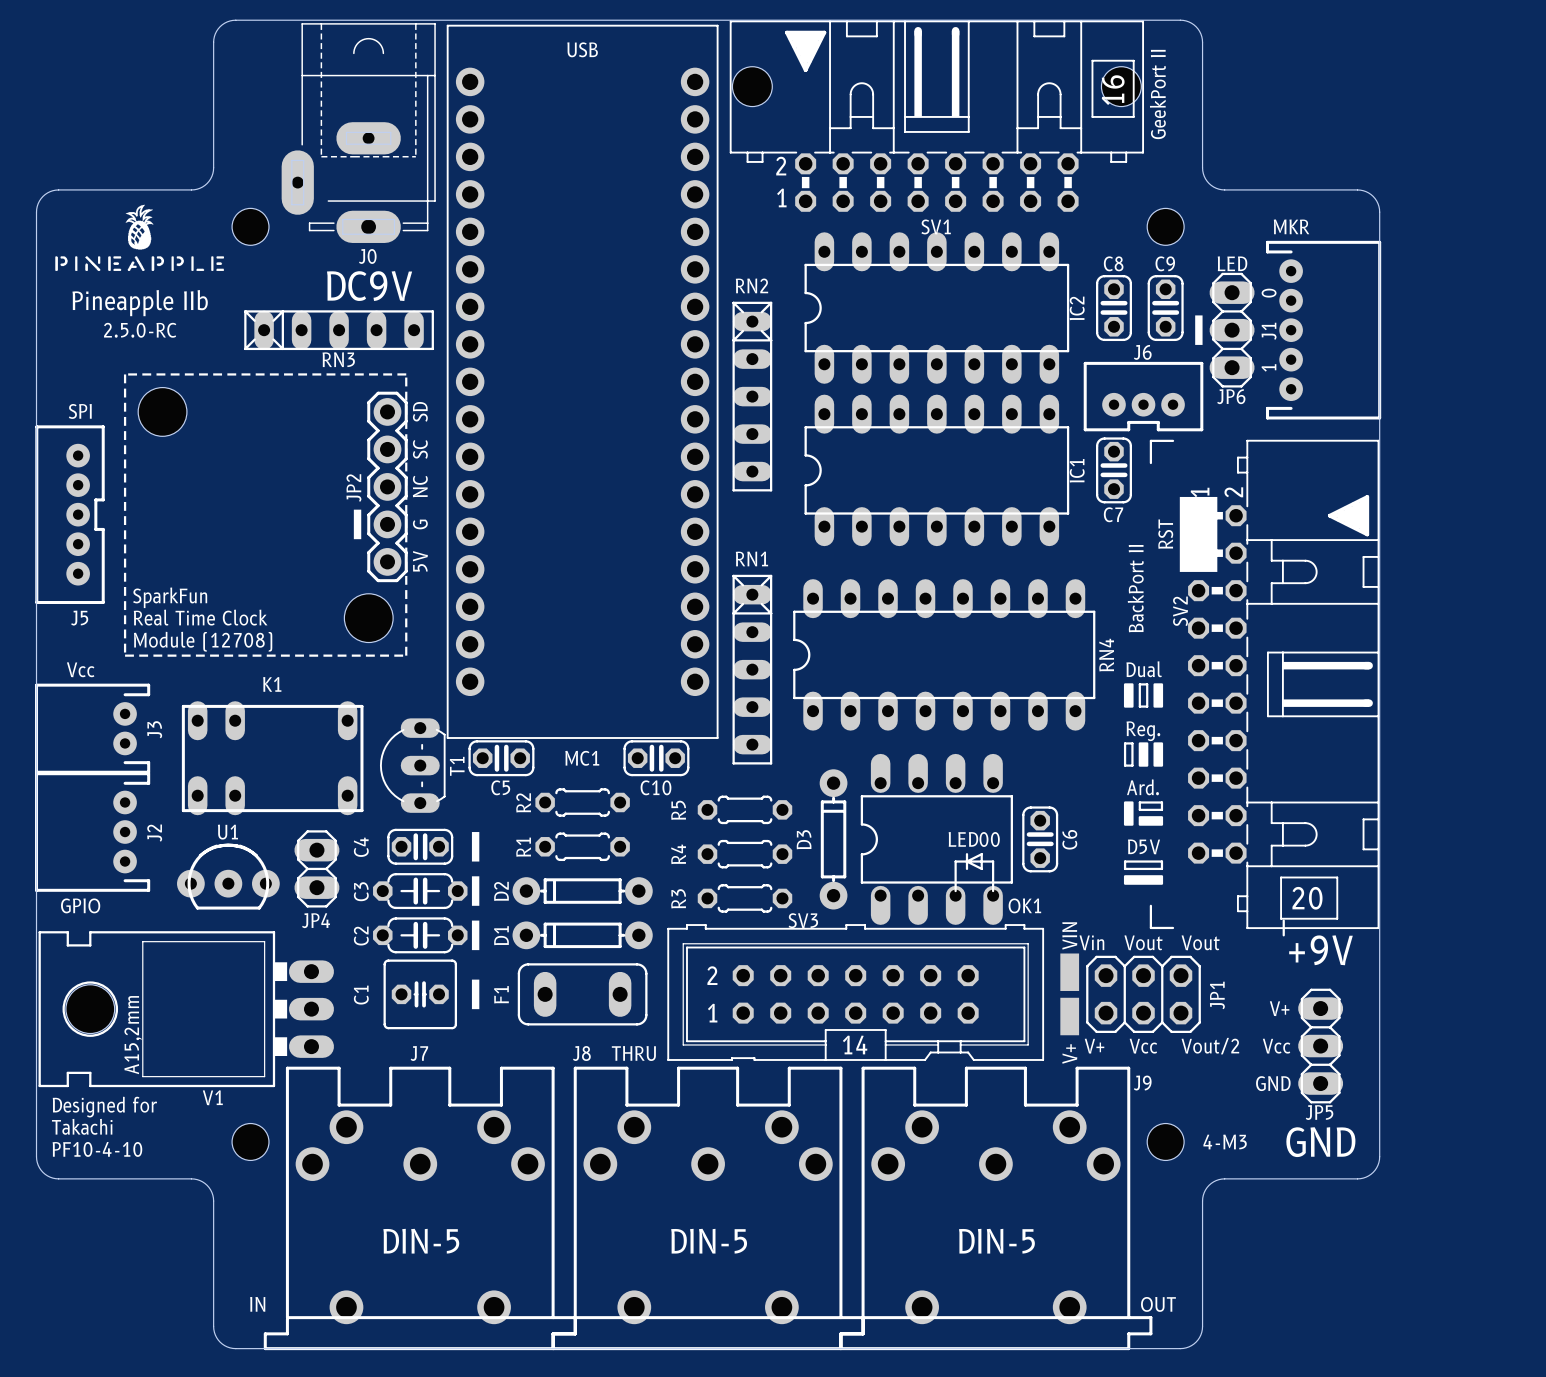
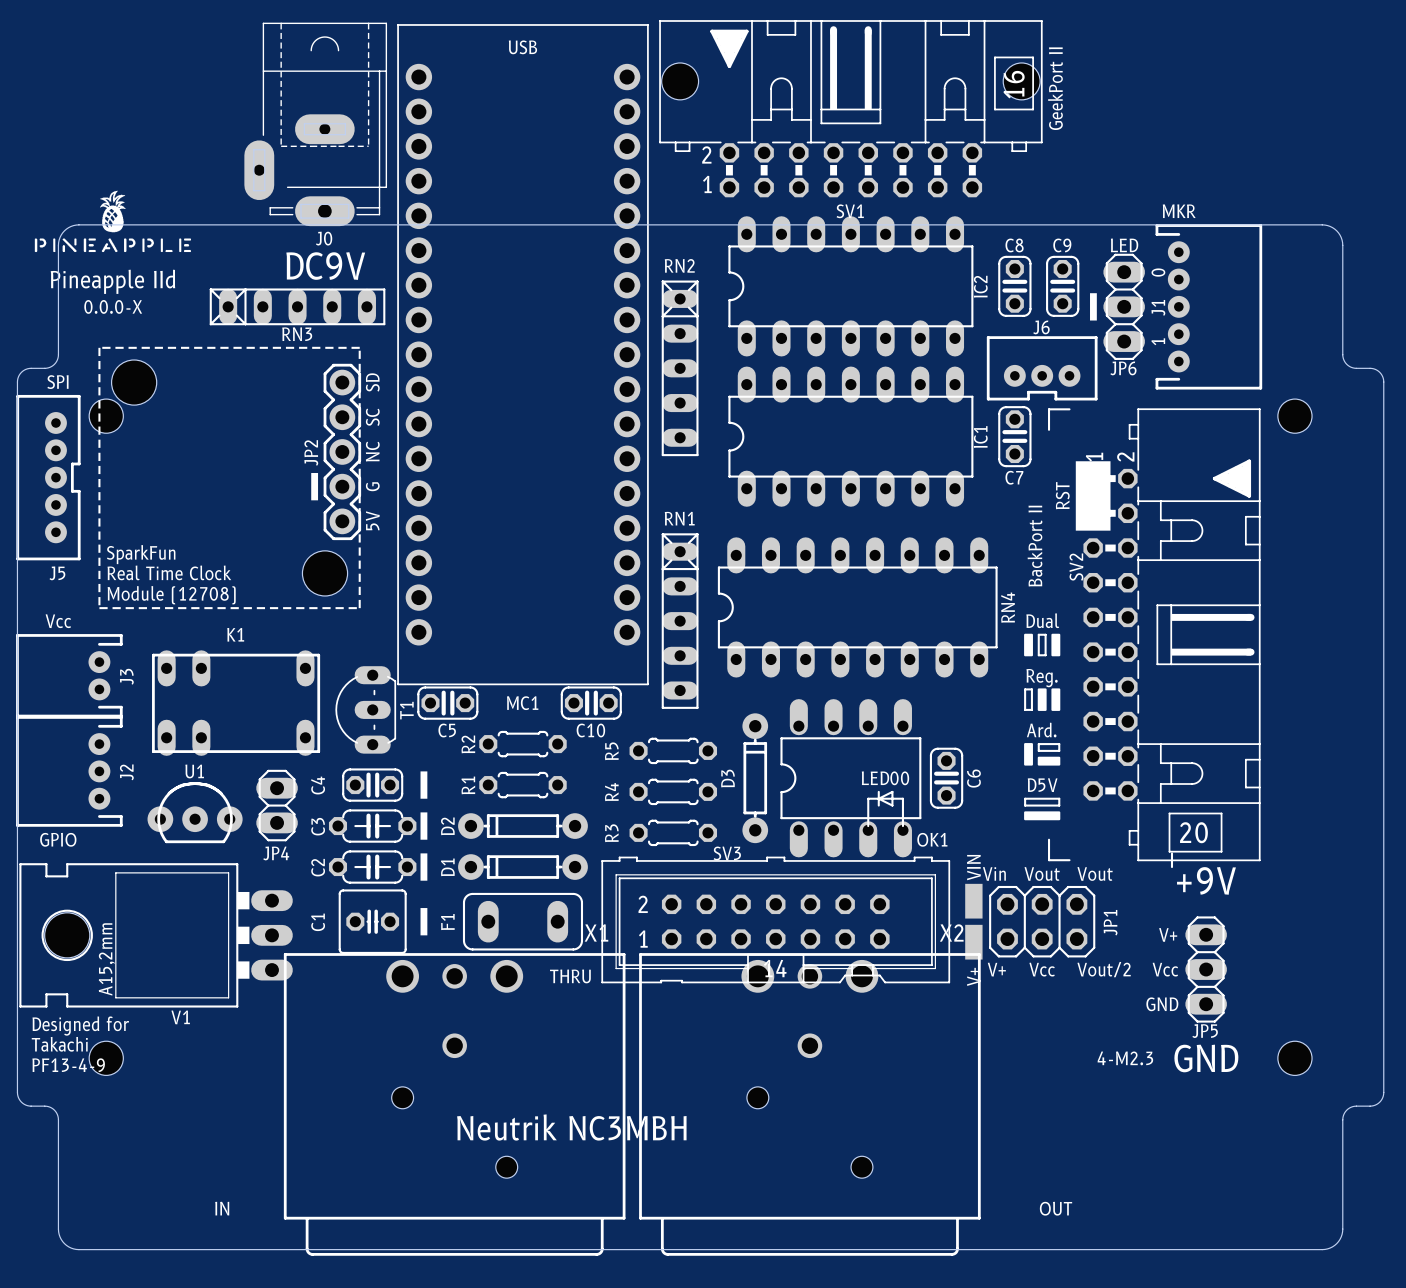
hole position: (250, 226) -> (106, 416)
hole position: (1165, 226) -> (1294, 416)
text: Pineapple IIb (140, 303) -> Pineapple IId (112, 281)
text: 2.5.0-RC (140, 330) -> 0.0.0-X (113, 306)
board edge: (36, 411) (36, 212) (39, 201) (47, 192) (55, 190) (191, 189) (199, 188) (207, 183) (211, 176) (213, 167) (213, 39) (220, 26) (230, 20) (1180, 20) (1193, 24) (1199, 31) (1202, 39) (1202, 167) (1204, 176) (1209, 183) (1216, 188) (1224, 189) (1360, 190) (1373, 196) (1379, 209) (1379, 1156) (1377, 1165) (1373, 1172) (1360, 1178) (1224, 1178) (1216, 1180) (1209, 1185) (1204, 1192) (1202, 1201) (1202, 1329) (1196, 1342) (1188, 1346) (1180, 1348) -> (17, 382) (19, 375) (24, 370) (48, 367) (57, 359) (58, 242) (64, 230) (76, 225) (1322, 224) (1334, 229) (1340, 235) (1342, 242) (1343, 358) (1351, 367) (1376, 370) (1381, 375) (1383, 382) (1383, 1096) (1376, 1104) (1351, 1107) (1343, 1116) (1342, 1231) (1340, 1239) (1332, 1246) (1322, 1249) (1076, 1249)
hole position: (250, 1141) -> (106, 1058)
hole position: (1165, 1141) -> (1294, 1058)
text: 4-M3 (1225, 1141) -> 4-M2.3 (1125, 1058)
text: PF10-4-10 (97, 1149) -> PF13-4-9 (68, 1065)
board edge: (36, 1156) (38, 1165) (42, 1172) (55, 1178) (191, 1178) (199, 1180) (207, 1185) (211, 1192) (213, 1201) (213, 1329) (220, 1342) (227, 1346) (235, 1348) -> (17, 1071) (17, 1094) (21, 1102) (29, 1106) (50, 1107) (57, 1116) (58, 1229) (60, 1236) (64, 1243) (71, 1248) (78, 1249) (201, 1249)
X1: none -> (454, 1104)
X2: none -> (809, 1104)
J7: (420, 1208) -> none
J8: (708, 1208) -> none
J9: (995, 1208) -> none
text: none -> Neutrik NC3MBH (571, 1127)

